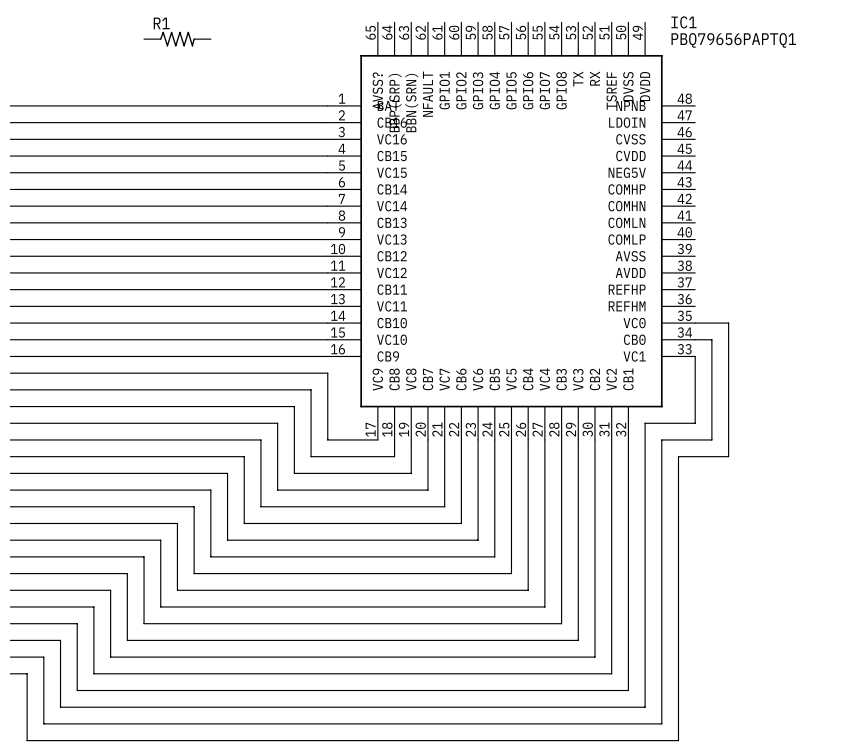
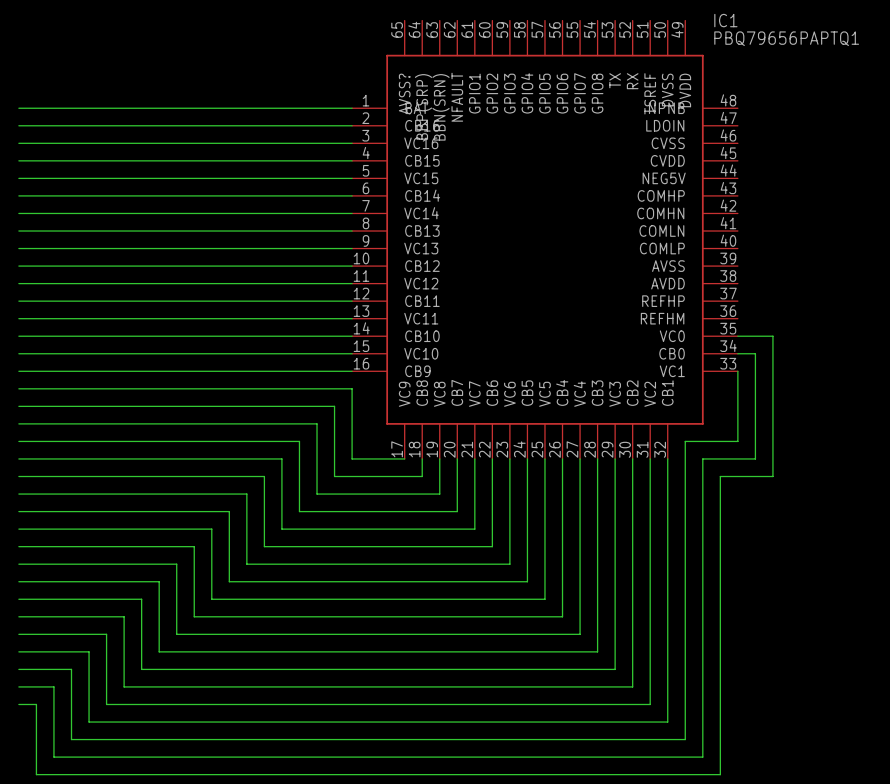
R1: (177, 39) -> none

